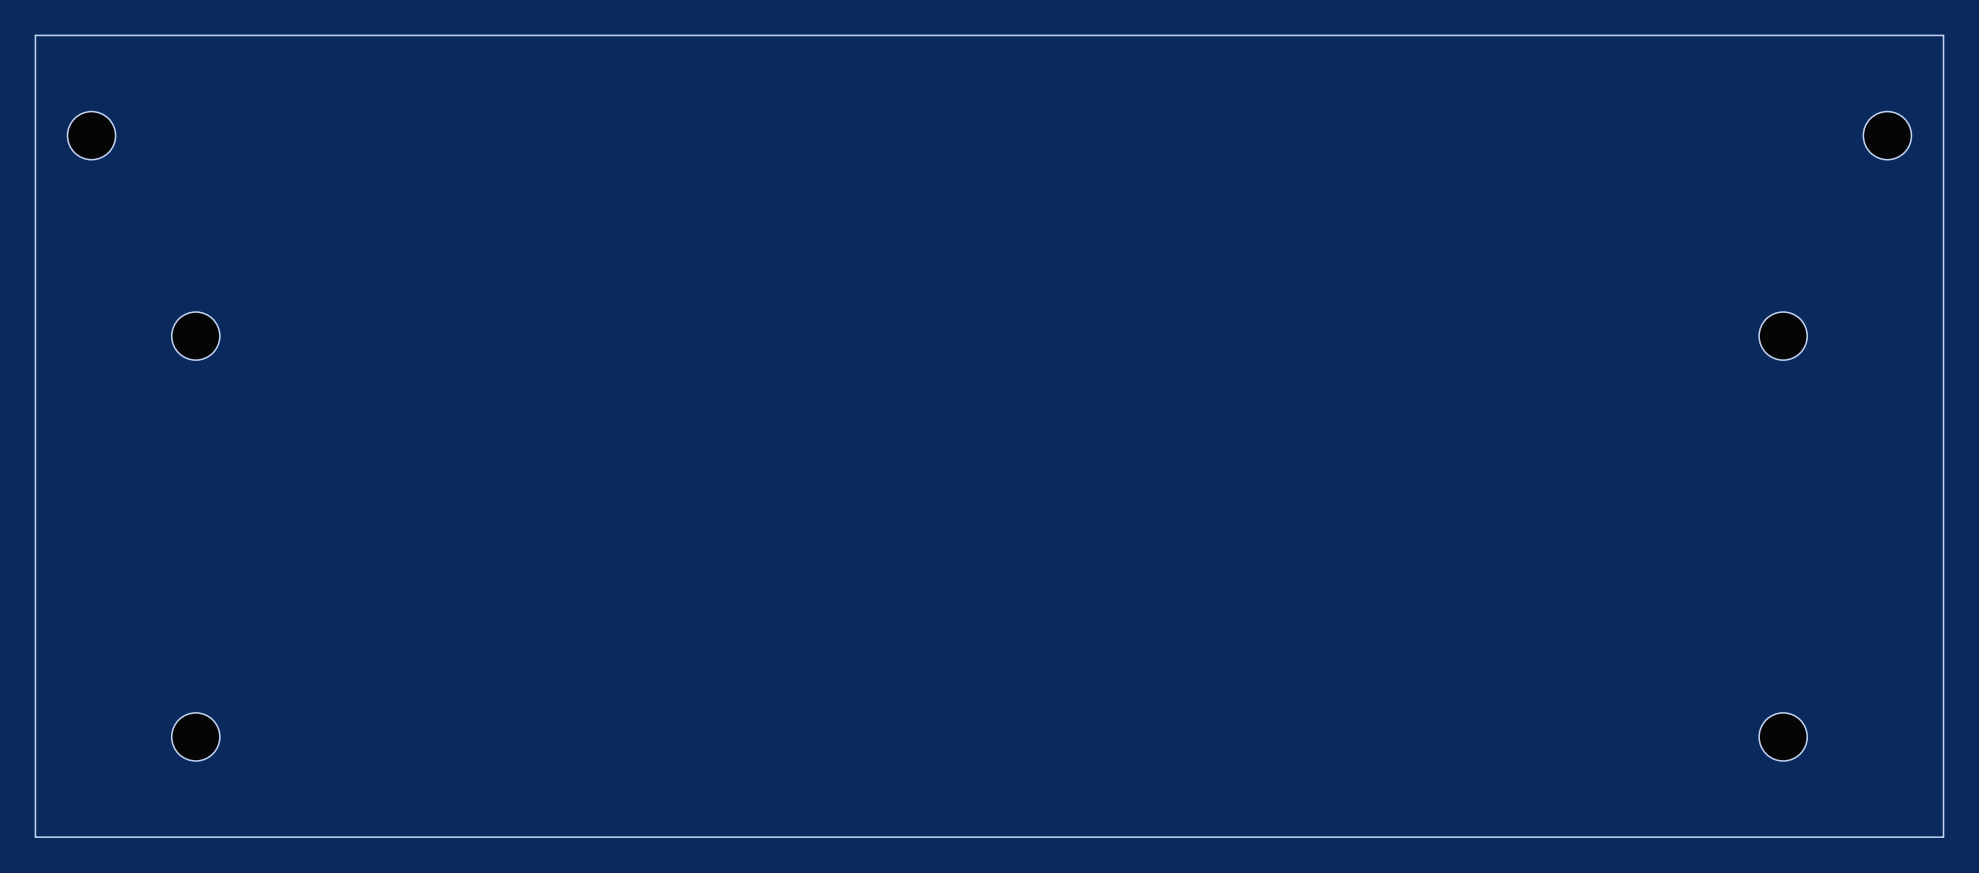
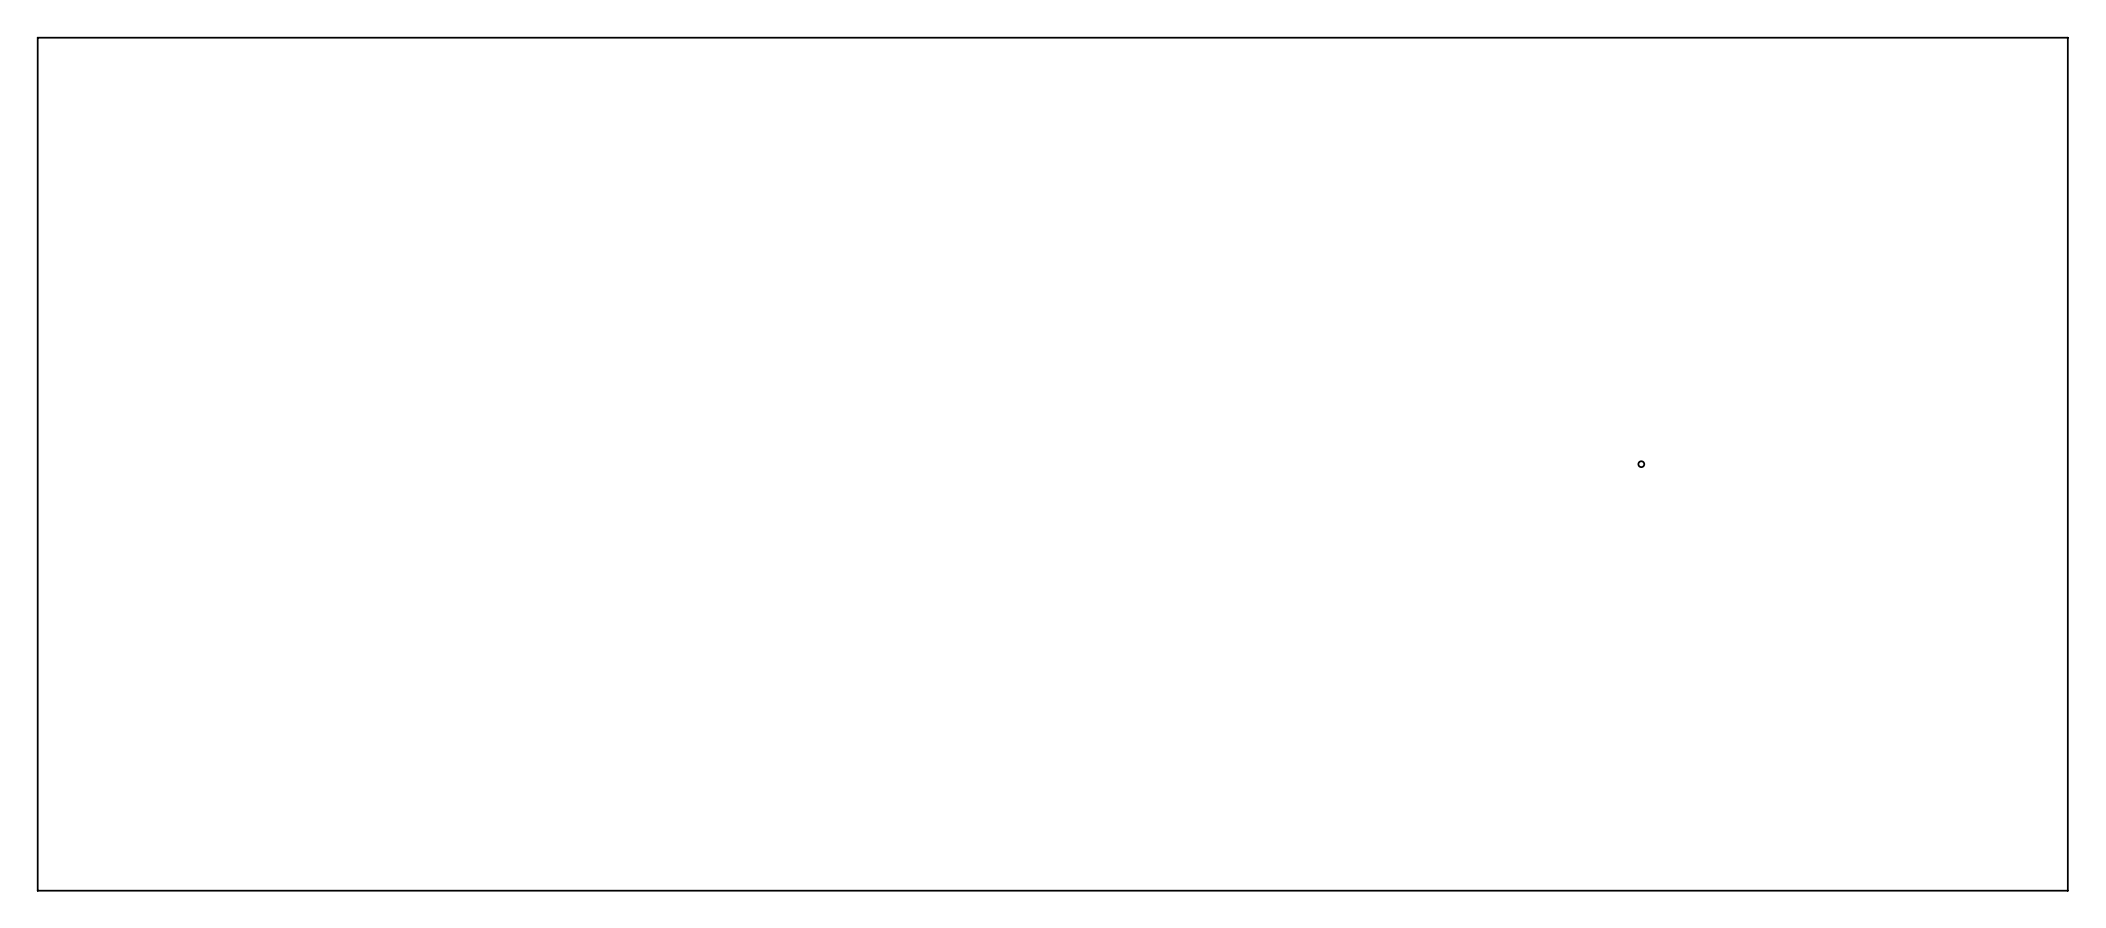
hole: (91, 135) -> none
hole: (1887, 135) -> none
hole: (195, 336) -> none
hole: (1783, 336) -> none
hole: none -> (1641, 464)
hole: (195, 736) -> none
hole: (1783, 736) -> none

